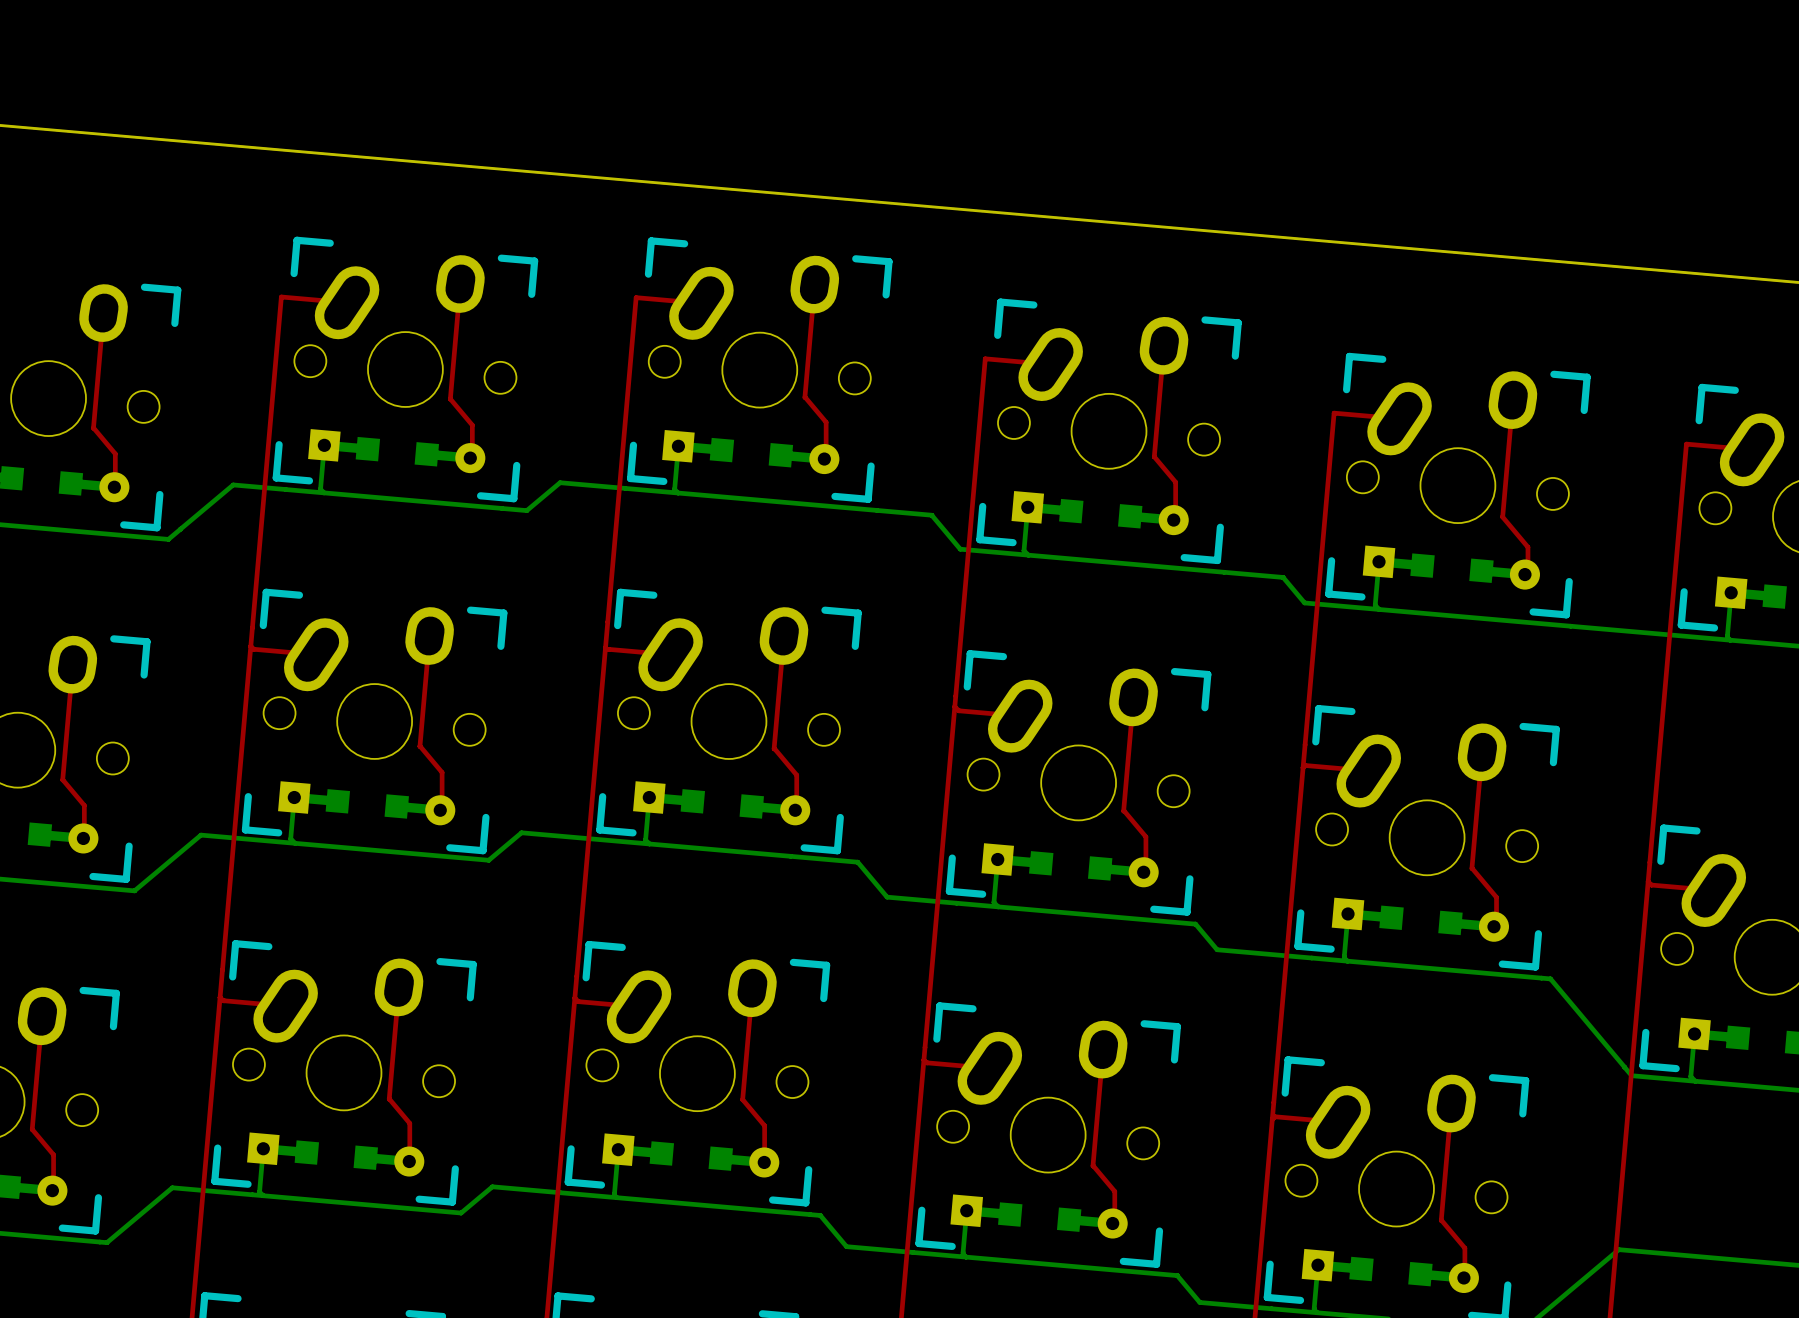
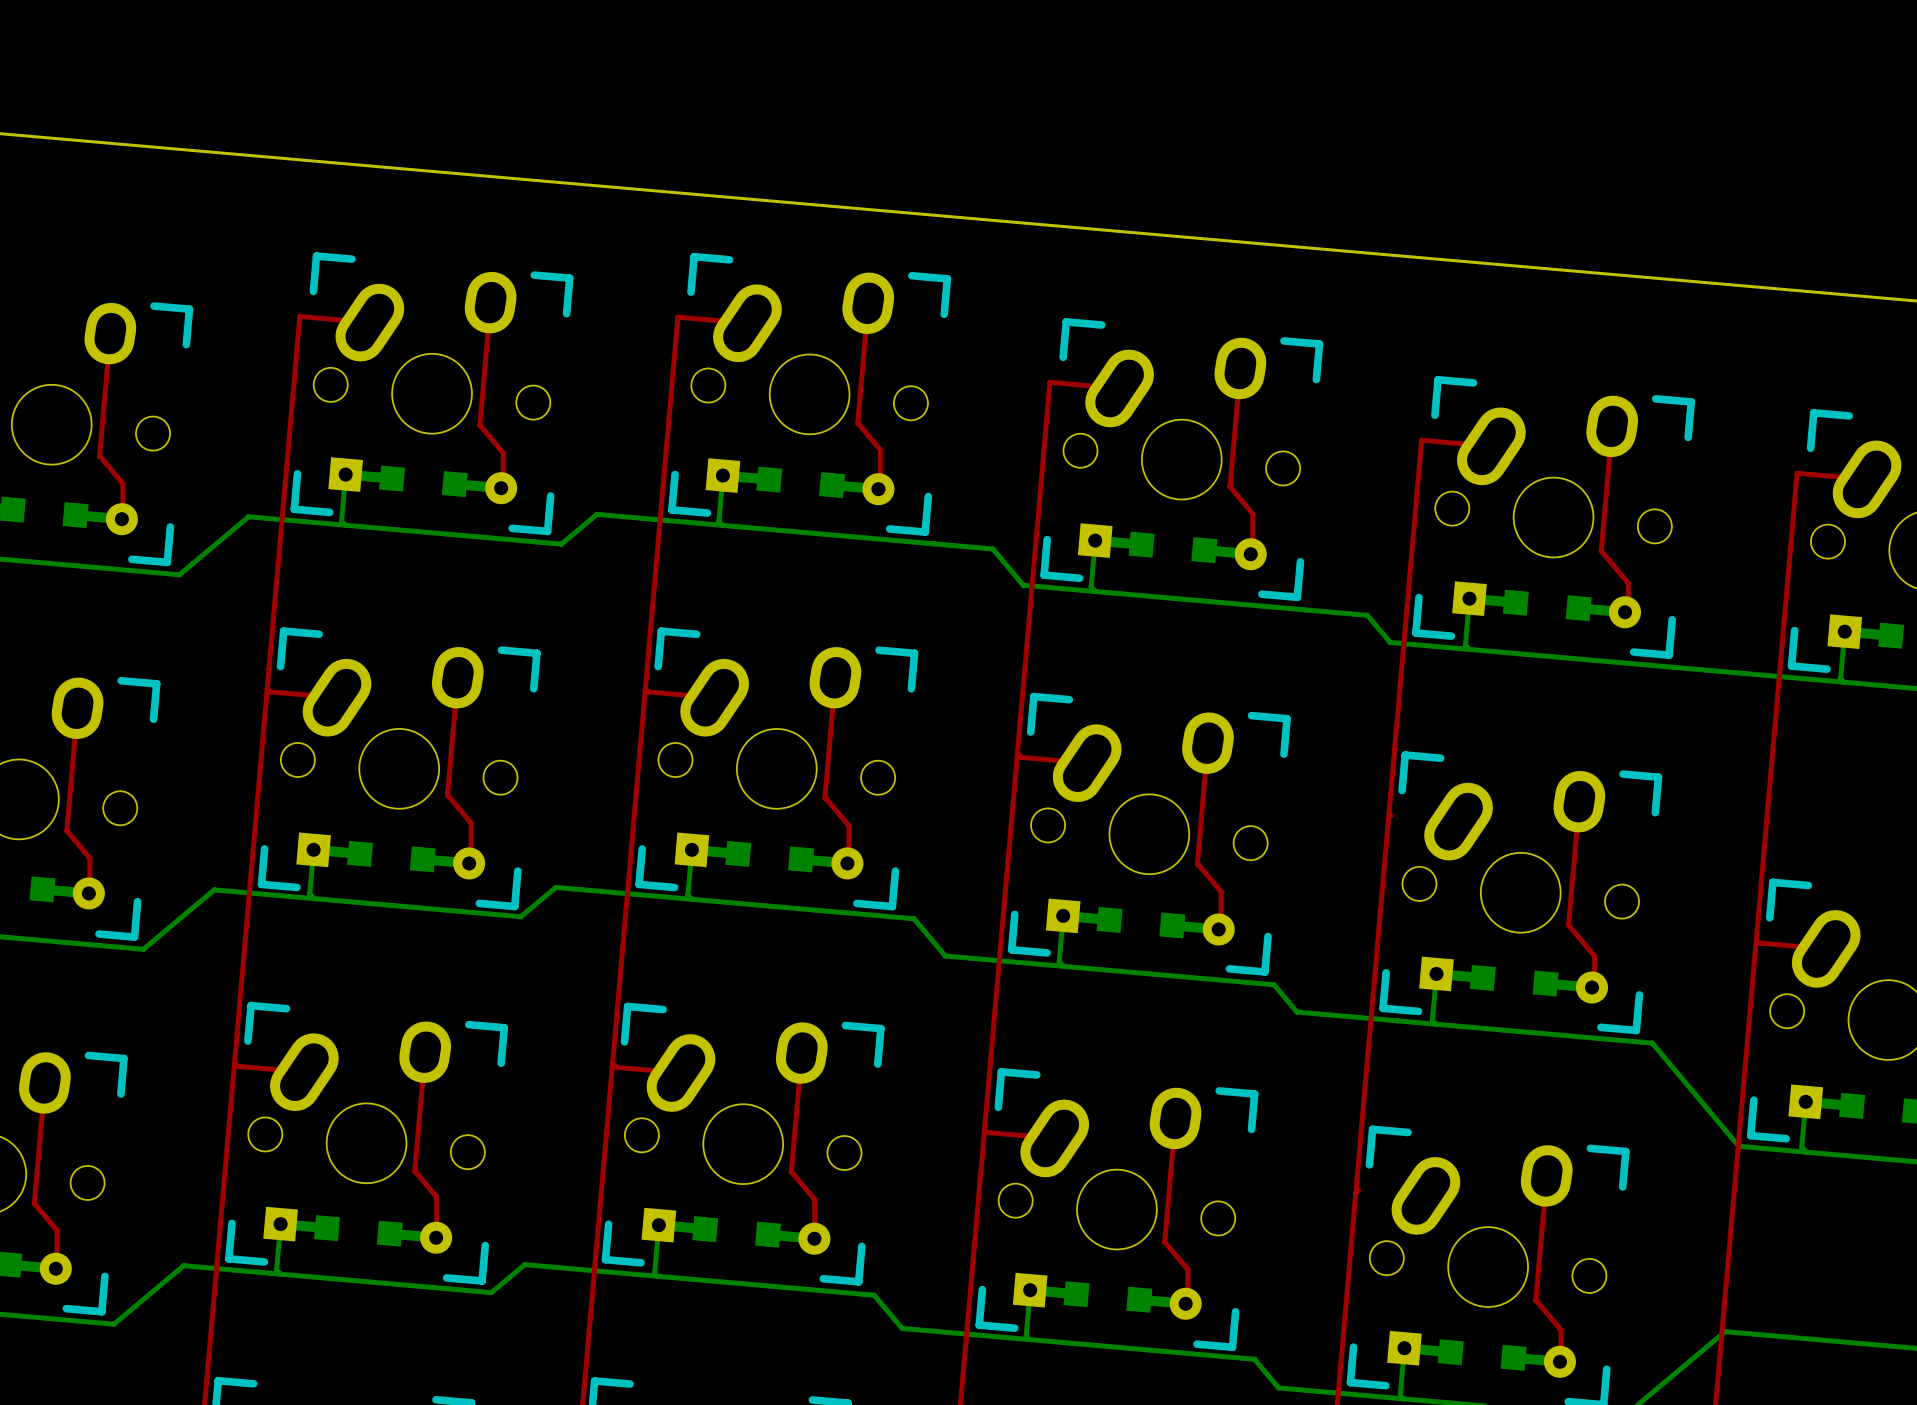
top track: (1305, 765) (1368, 771) -> none
top track: (1274, 1116) (1338, 1122) -> none

